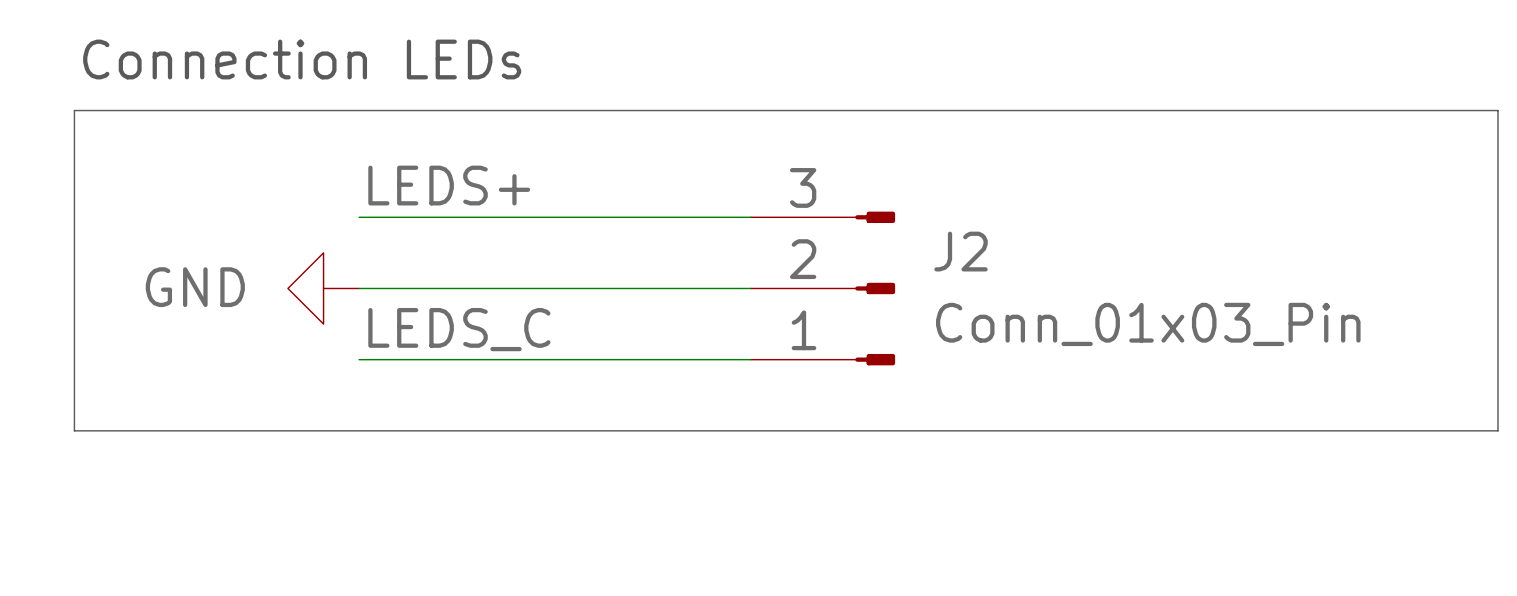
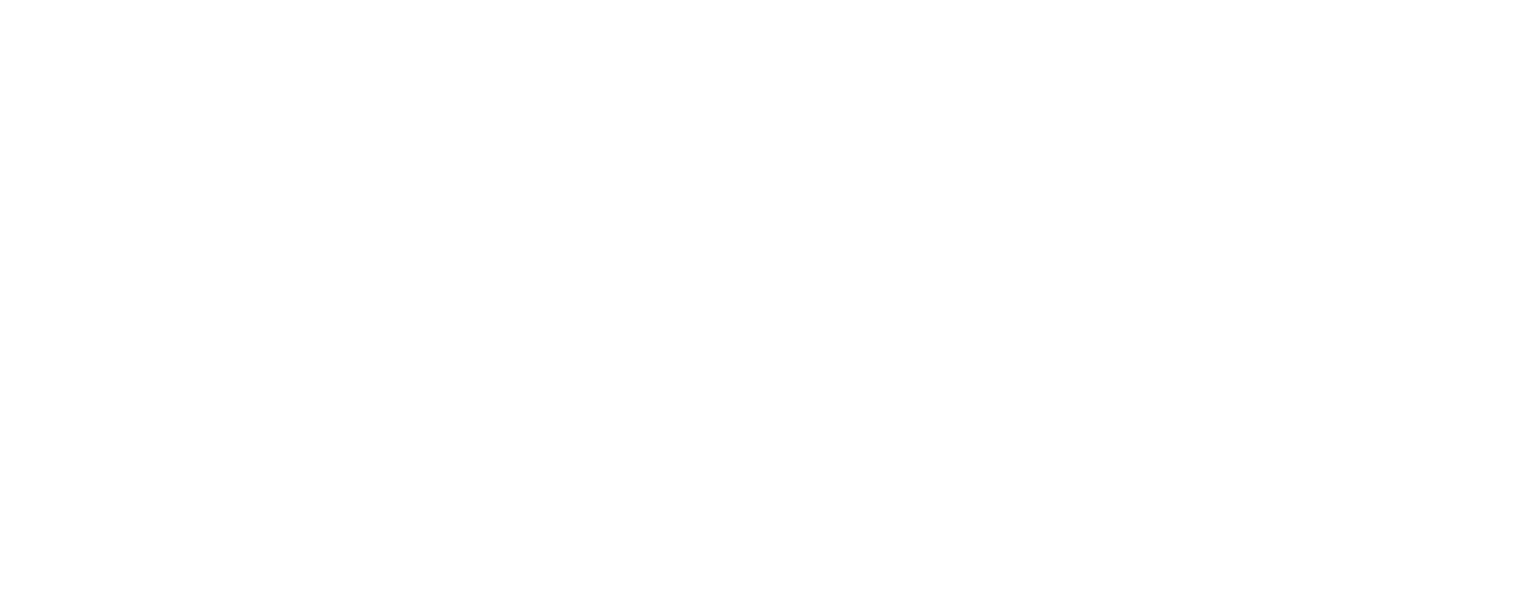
text: Connection LEDs (302, 59) -> none
line: (74, 110) (1497, 110) (1497, 430) (74, 430) (74, 110) -> none
label: LEDS+ (449, 185) -> none
wire: (359, 217) (750, 217) -> none
power symbol: GND (323, 288) -> none
wire: (359, 288) (750, 288) -> none
J2: Conn_01x03_Pin (822, 288) -> none
label: LEDS_C (459, 329) -> none
wire: (359, 359) (750, 359) -> none

